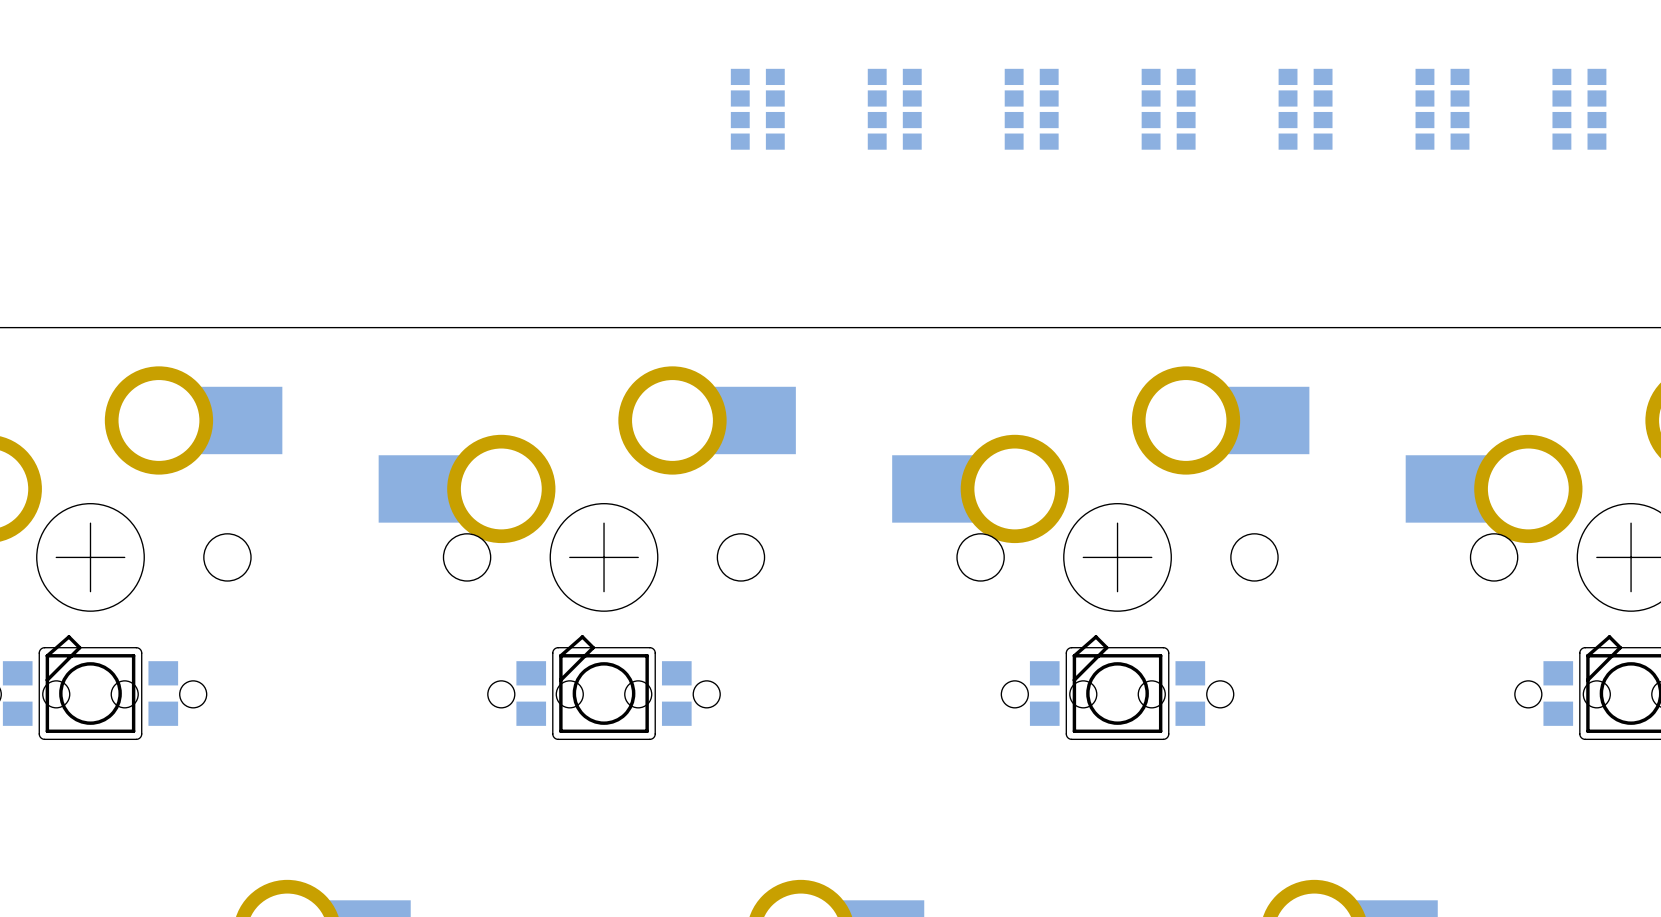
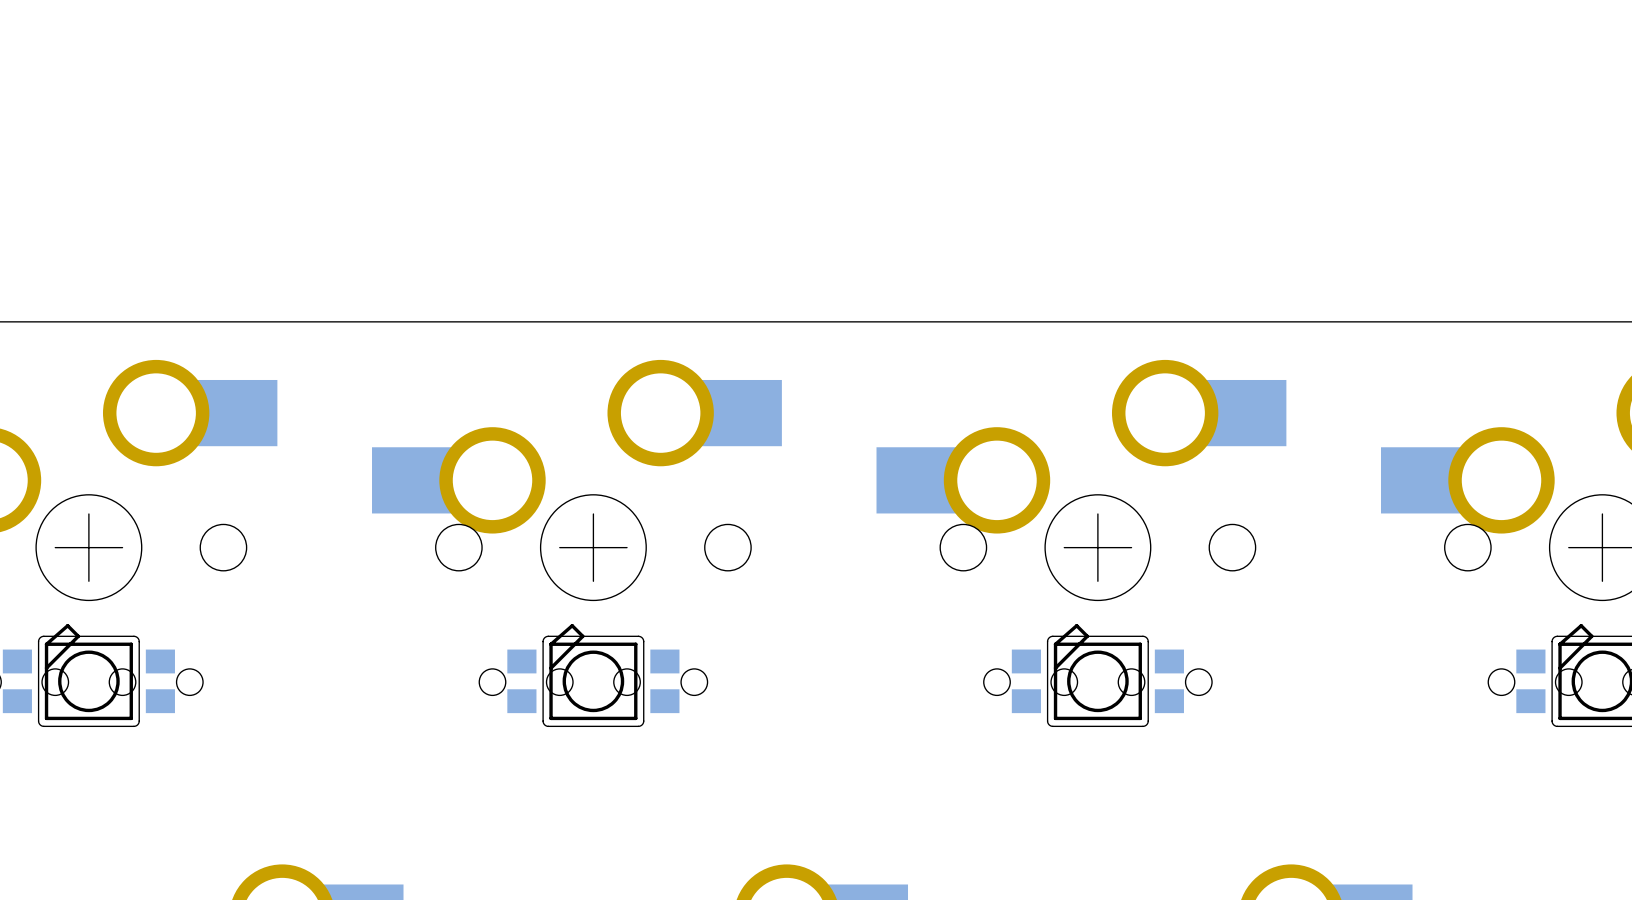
part: (757, 109) -> none
part: (894, 109) -> none
part: (1031, 109) -> none
part: (1168, 109) -> none
part: (1305, 109) -> none
part: (1442, 109) -> none
part: (1579, 109) -> none

